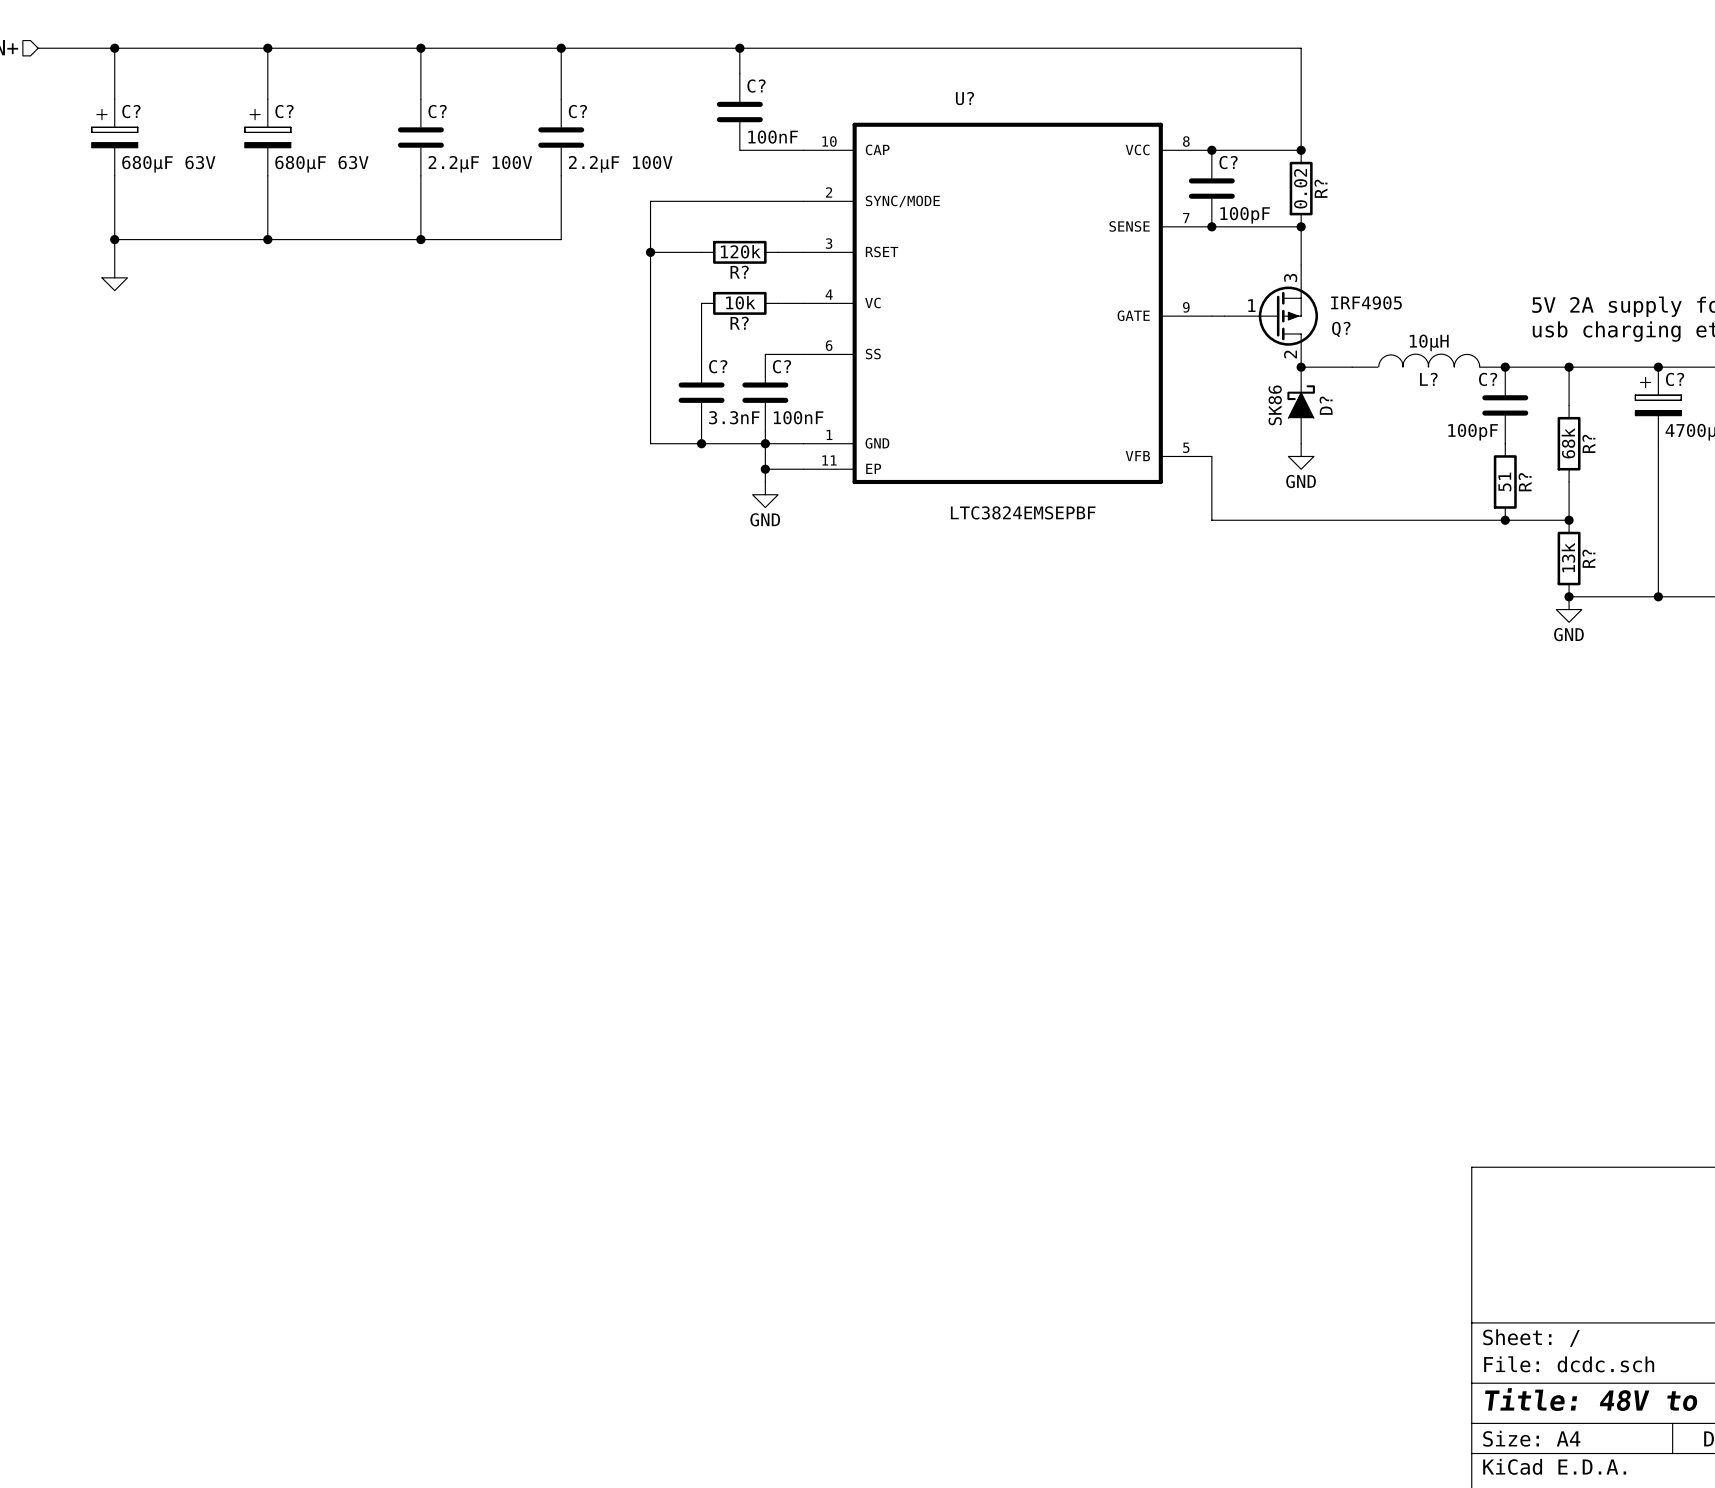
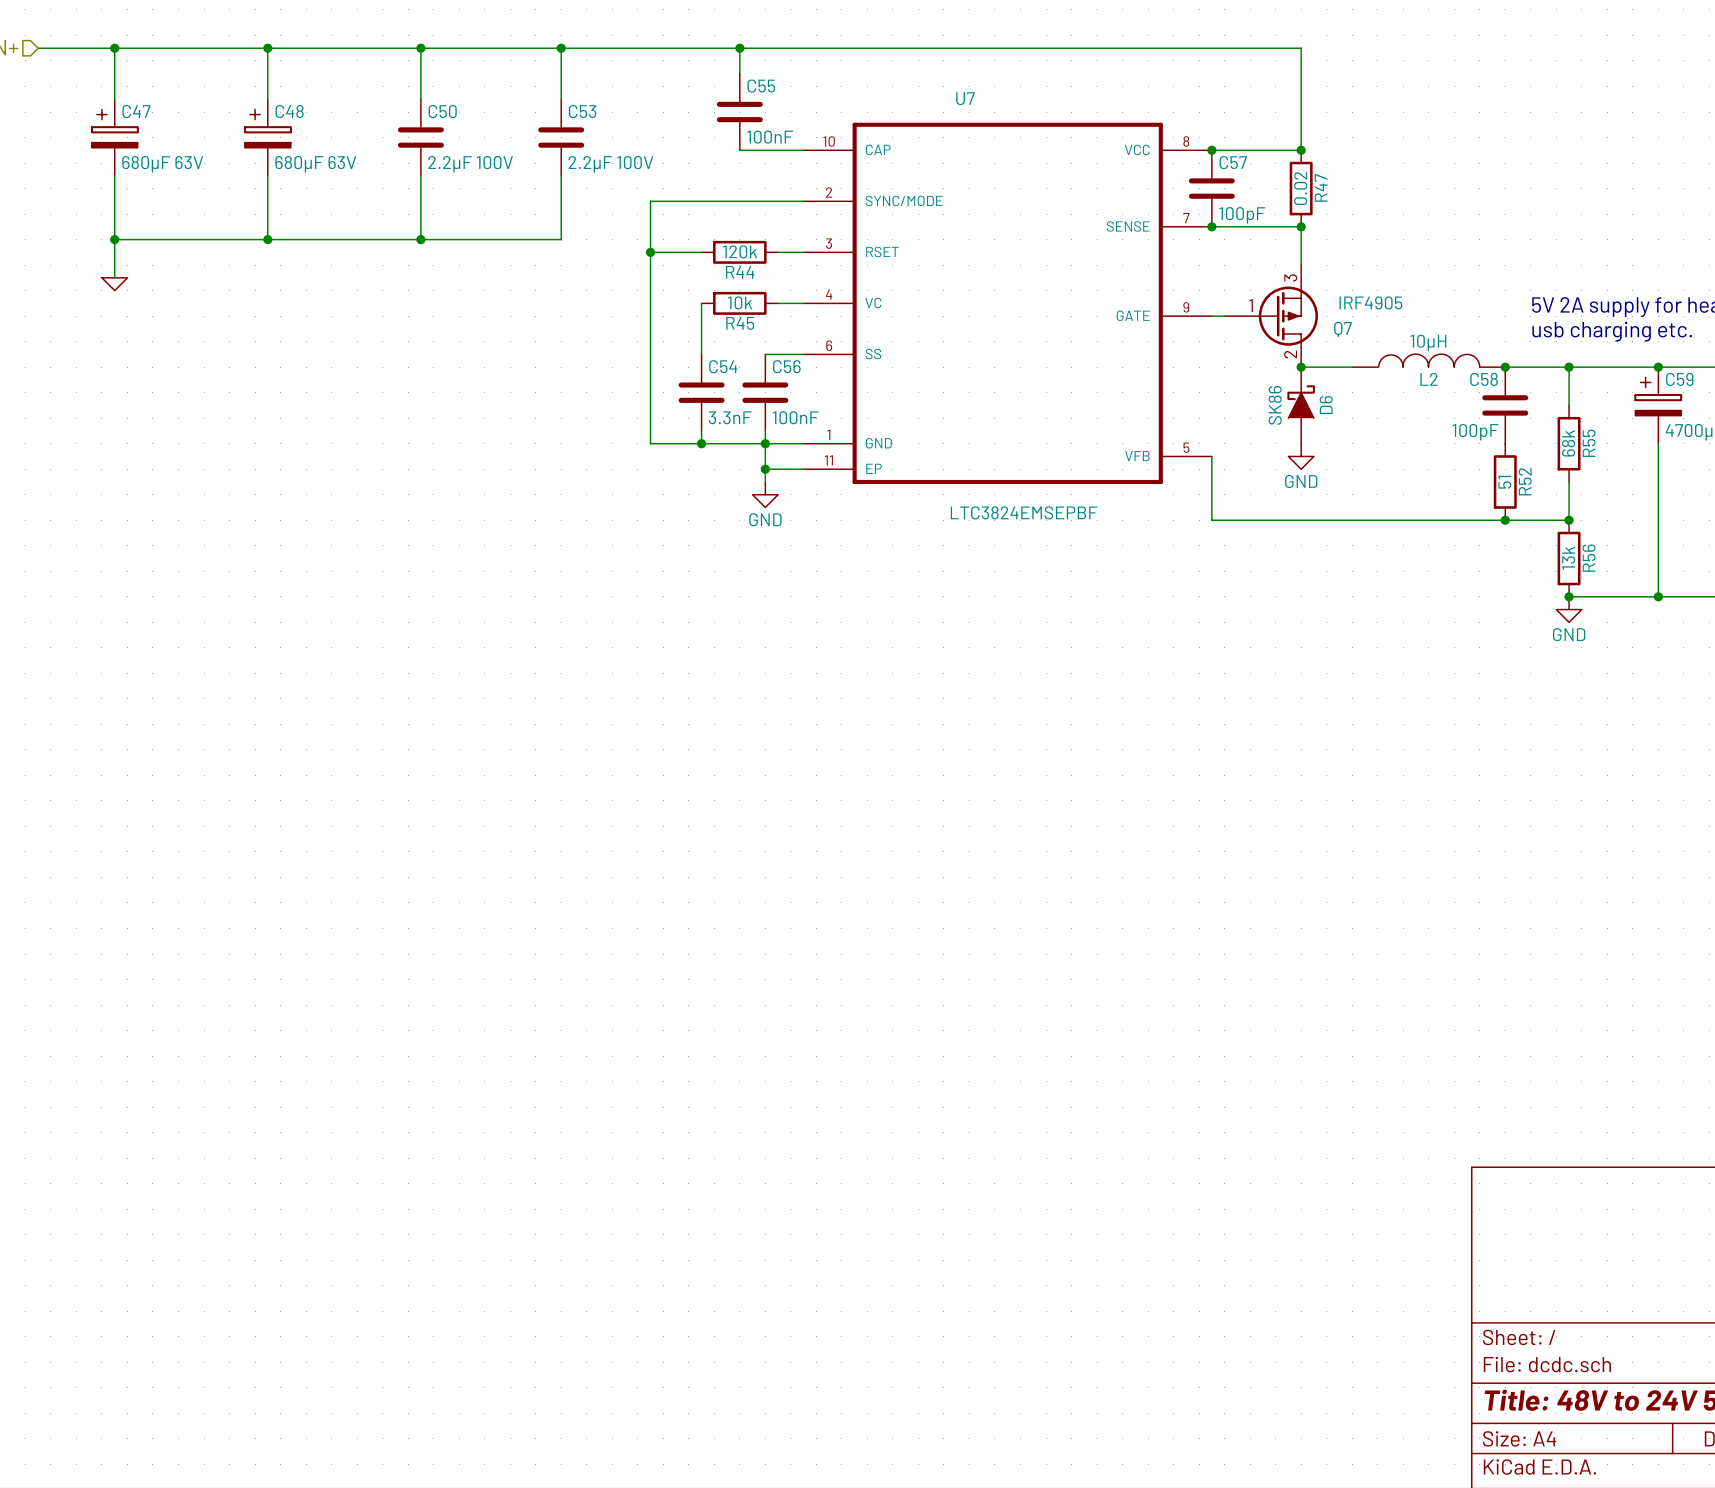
C? name: C? (756, 86) -> C55 (761, 86)
U? name: U? (965, 98) -> U7 (965, 98)
C? name: C? (131, 111) -> C47 (136, 111)
C? name: C? (284, 111) -> C48 (289, 111)
C? name: C? (437, 111) -> C50 (442, 111)
C? name: C? (577, 111) -> C53 (582, 111)
C? name: C? (1228, 162) -> C57 (1233, 162)
R? name: R? (1320, 188) -> R47 (1321, 187)
R? name: R? (739, 272) -> R44 (740, 272)
R? name: R? (739, 323) -> R45 (740, 323)
Q? name: Q? (1341, 329) -> Q7 (1342, 329)
C? name: C? (718, 366) -> C54 (723, 366)
C? name: C? (782, 366) -> C56 (786, 366)
L? name: L? (1428, 379) -> L2 (1429, 379)
C? name: C? (1488, 379) -> C58 (1484, 379)
C? name: C? (1675, 379) -> C59 (1679, 379)
D? name: D? (1326, 405) -> D6 (1326, 405)
R? name: R? (1588, 443) -> R55 (1589, 443)
R? name: R? (1525, 482) -> R52 (1525, 481)
R? name: R? (1588, 558) -> R56 (1588, 558)

